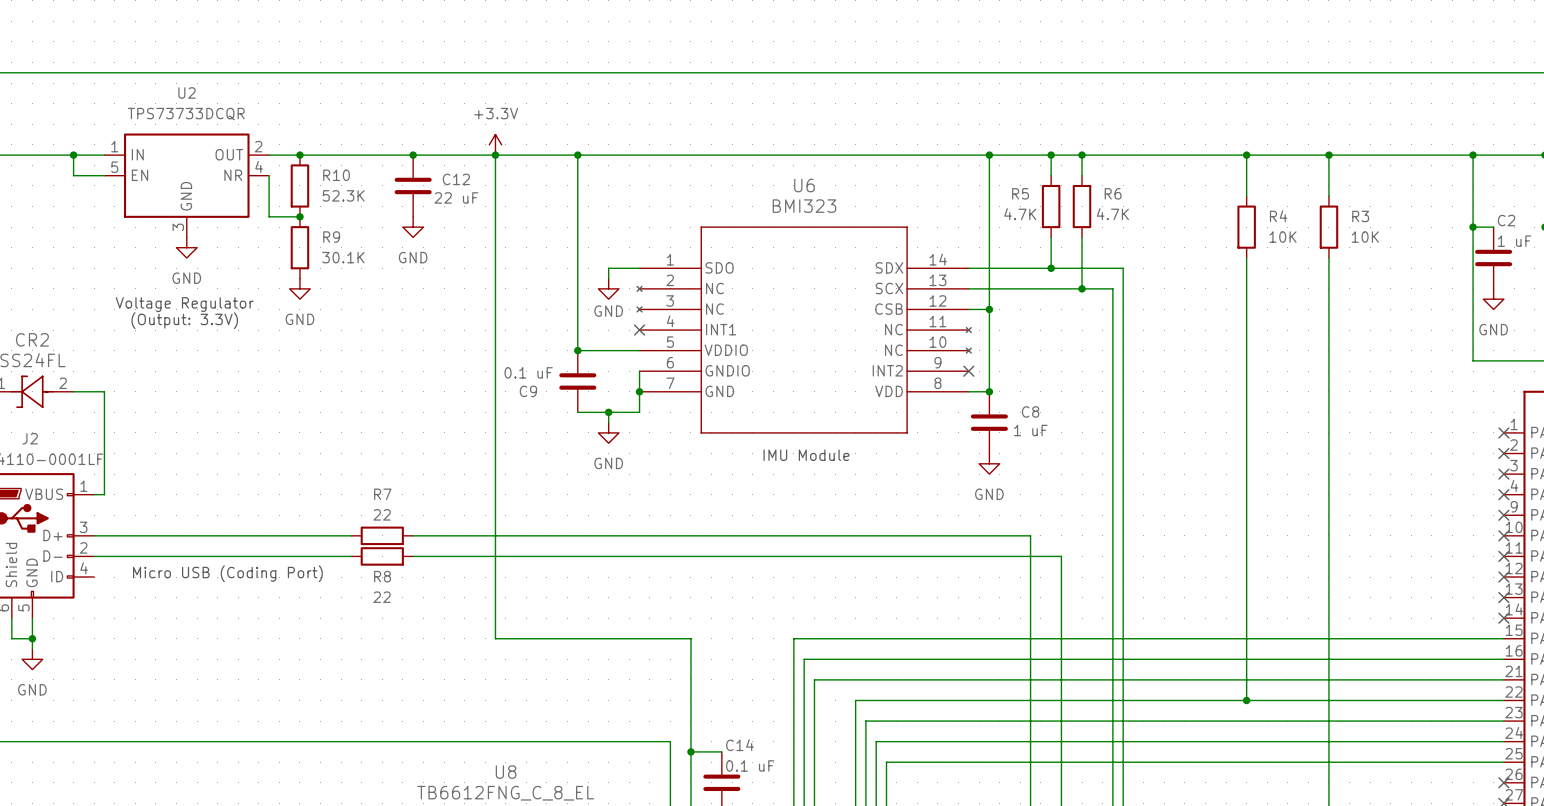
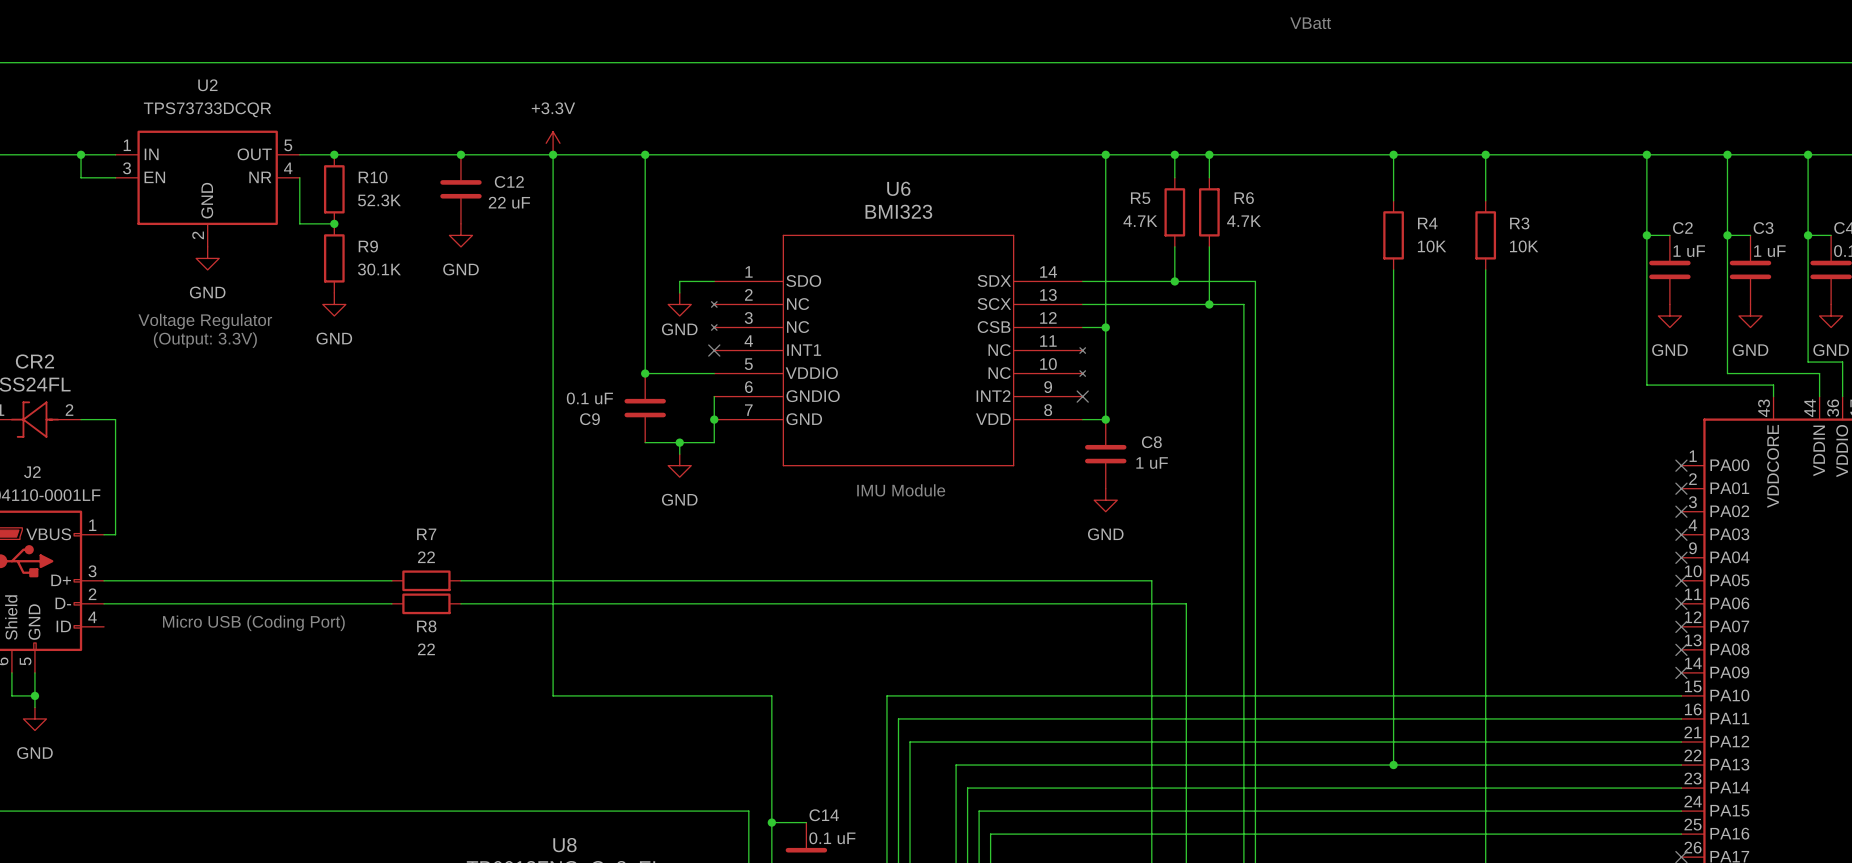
text: none -> VBatt (1310, 23)
U2 pin number: 2 (258, 146) -> 5 (288, 145)
U2 pin number: 5 (114, 167) -> 3 (127, 168)
U2 pin number: 3 (178, 227) -> 2 (198, 235)

